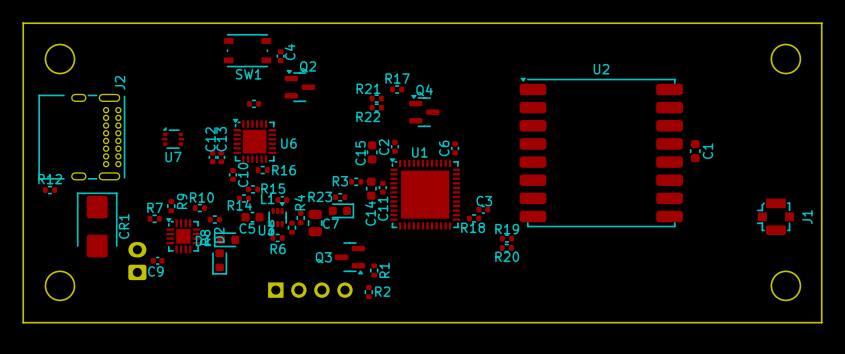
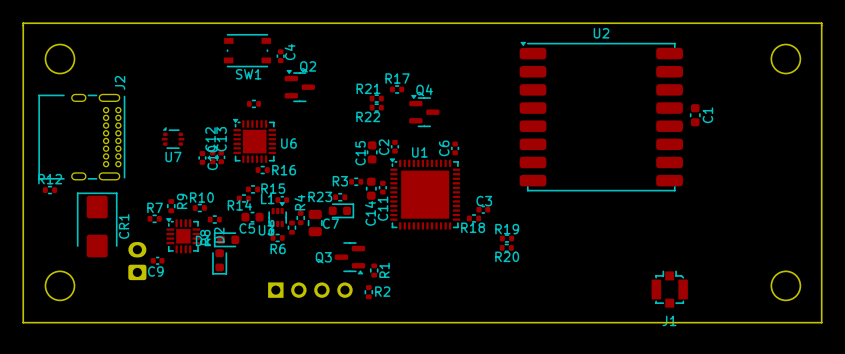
C1 position: (695, 151) -> (695, 115)
U2 position: (601, 152) -> (601, 116)
C10 position: (232, 174) -> (202, 157)
J1 rotation: 0° (775, 216) -> 90° clockwise (669, 289)
J1 position: (775, 216) -> (669, 289)

